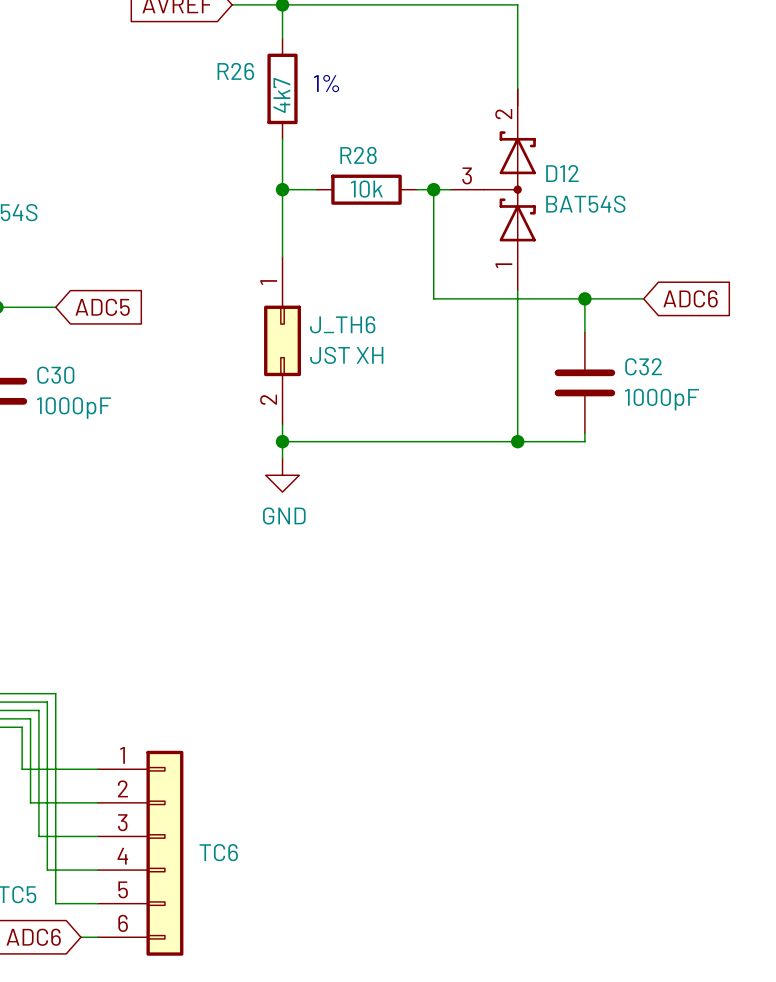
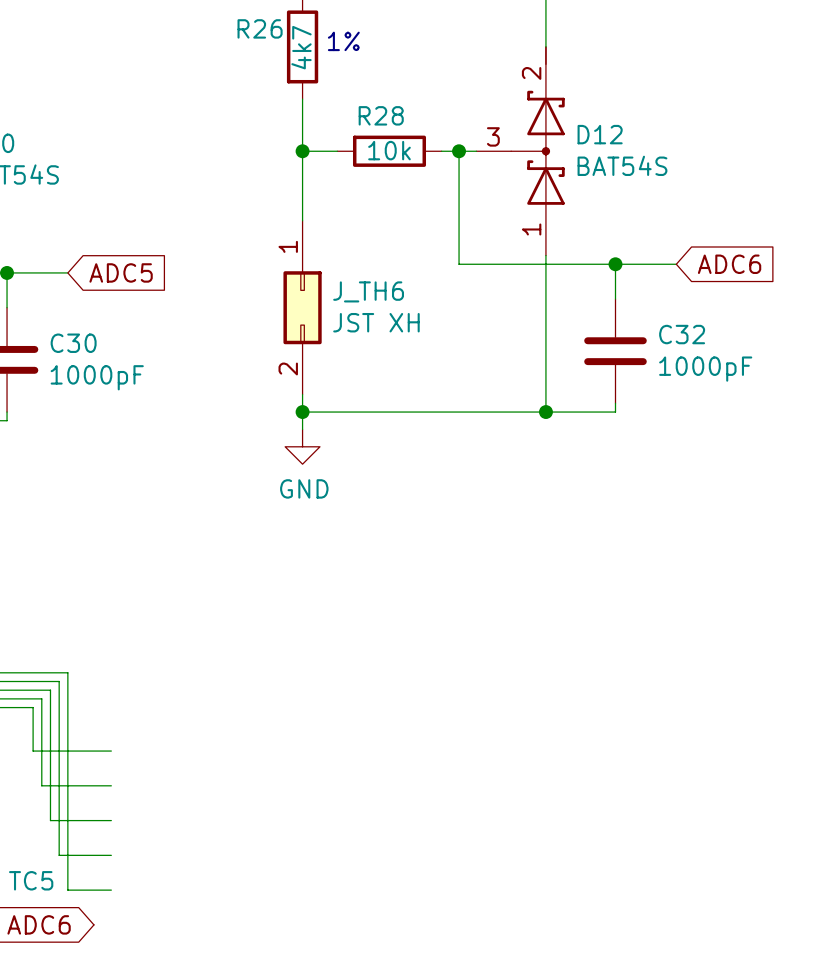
TC6: (140, 853) -> none
wire: (80, 937) (97, 937) -> none

